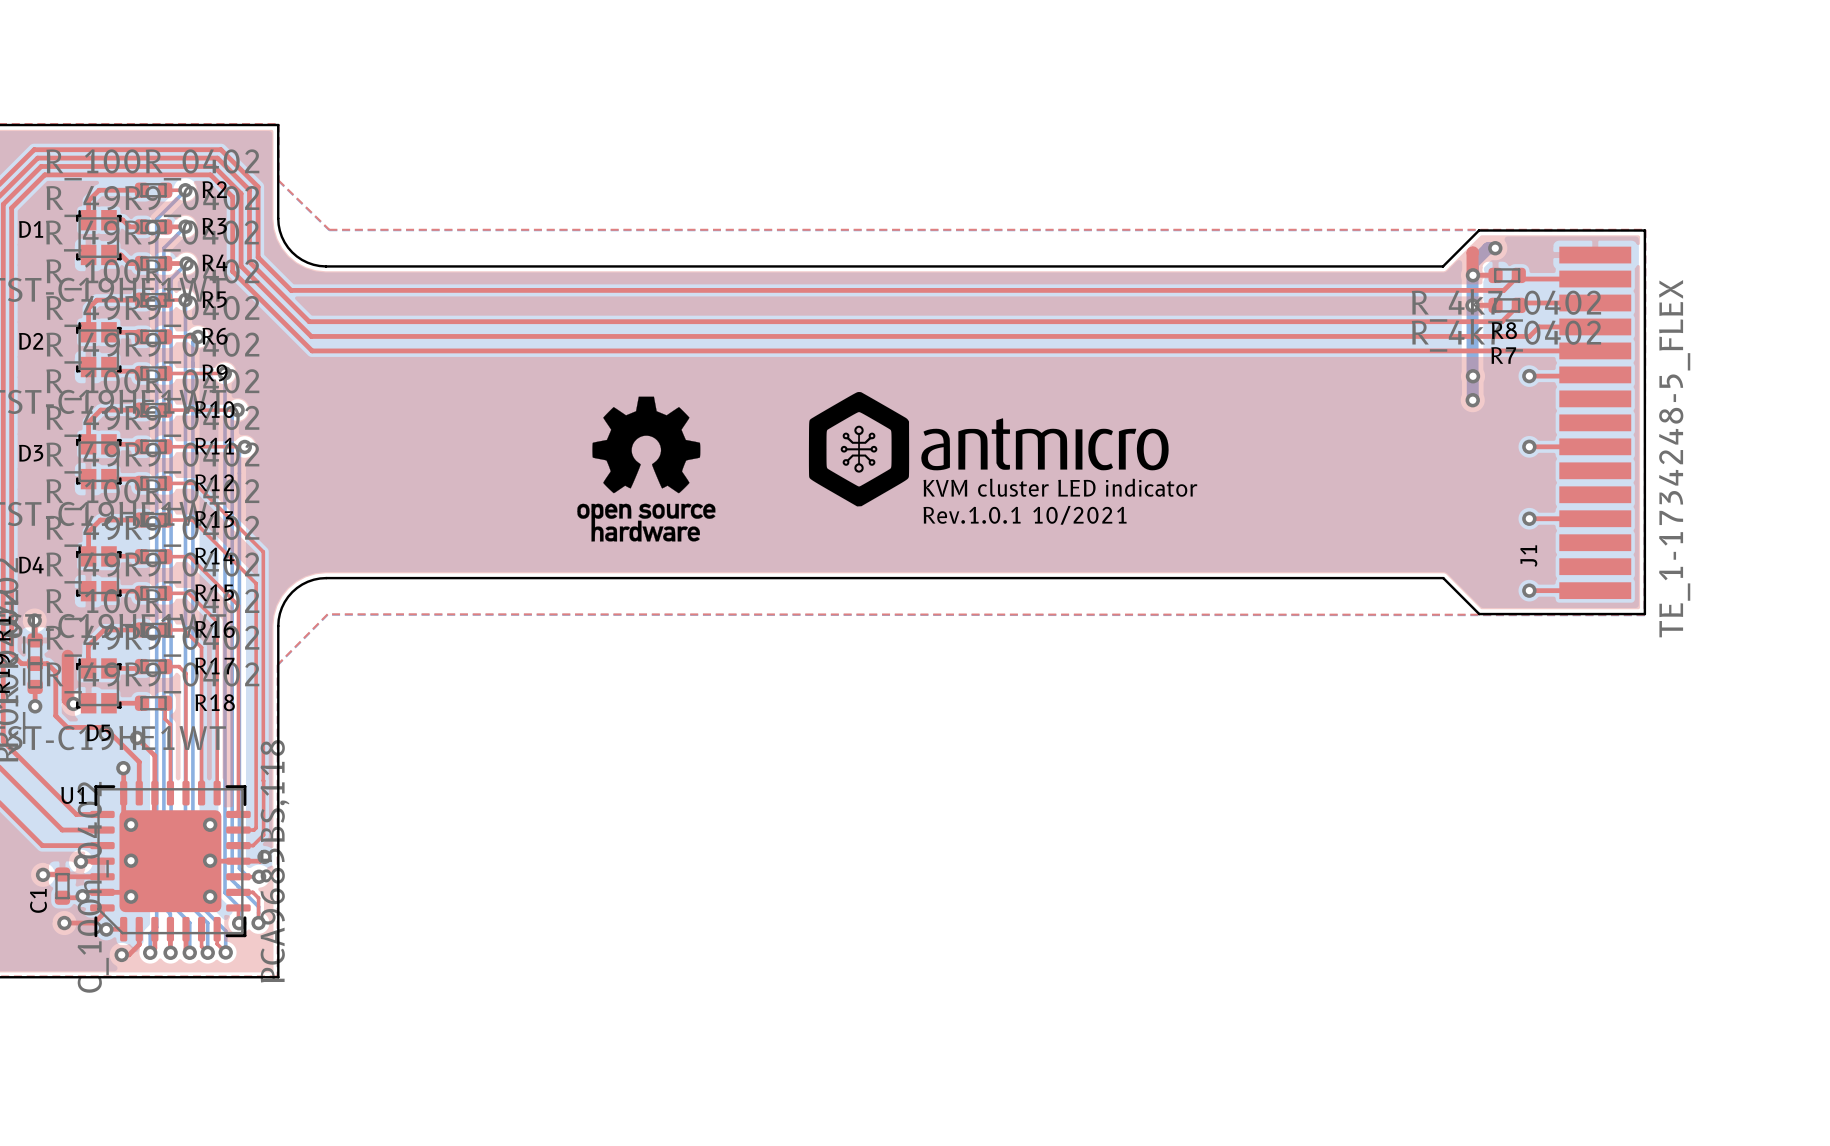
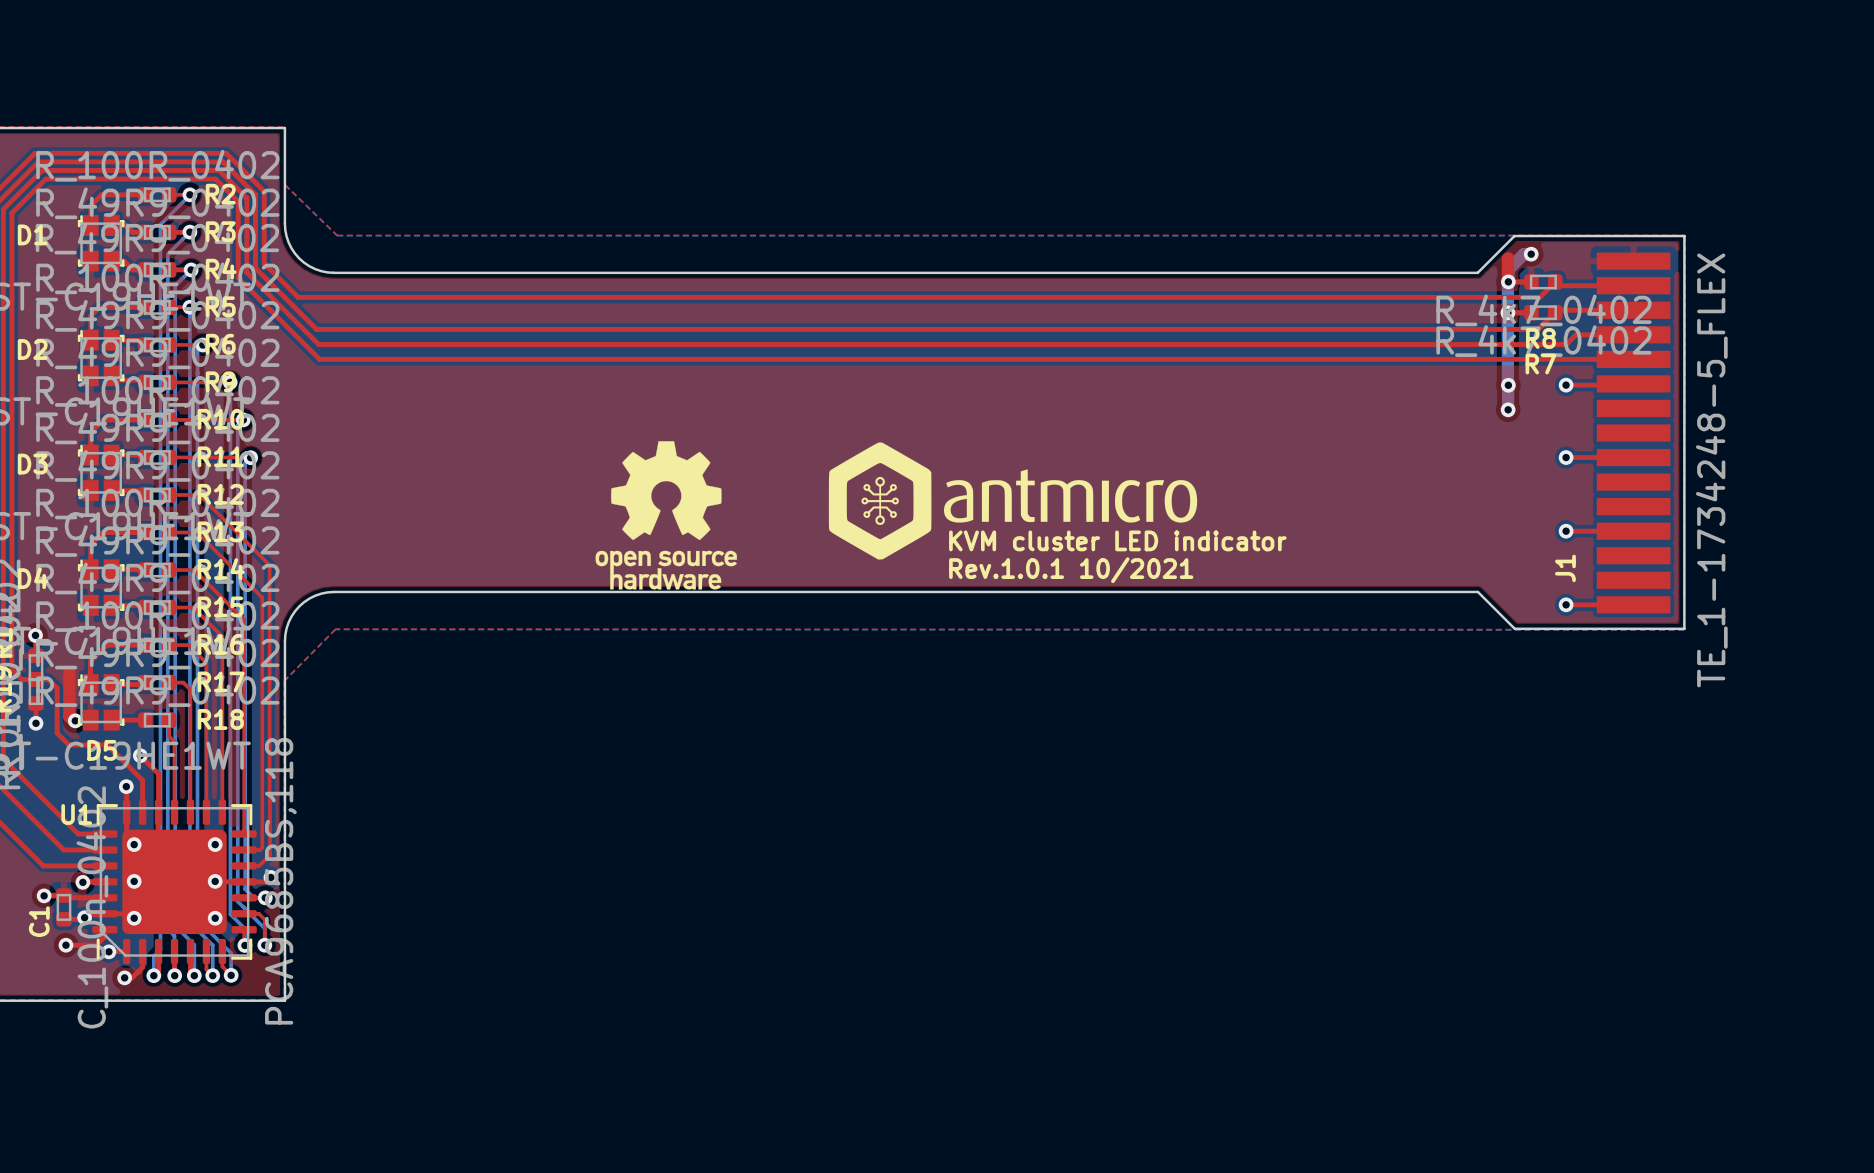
drawing position: (988, 449) -> (1013, 501)
drawing position: (646, 469) -> (666, 515)
text: KVM cluster LED indicator (1060, 487) -> none
text: Rev.1.0.1 10/2021 (1025, 515) -> KVM cluster LED indicator (1117, 540)
text: none -> Rev.1.0.1 10/2021 (1071, 570)

